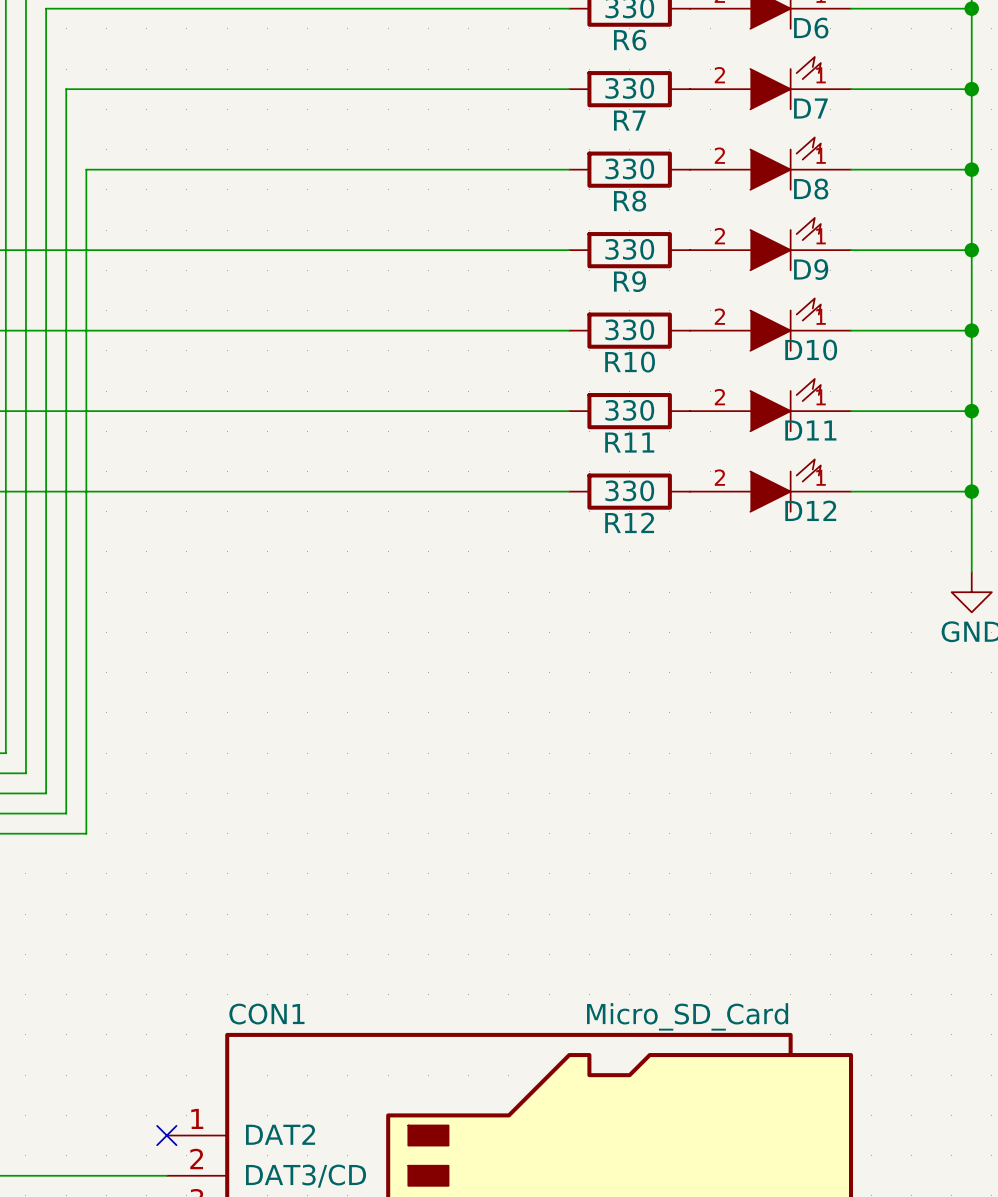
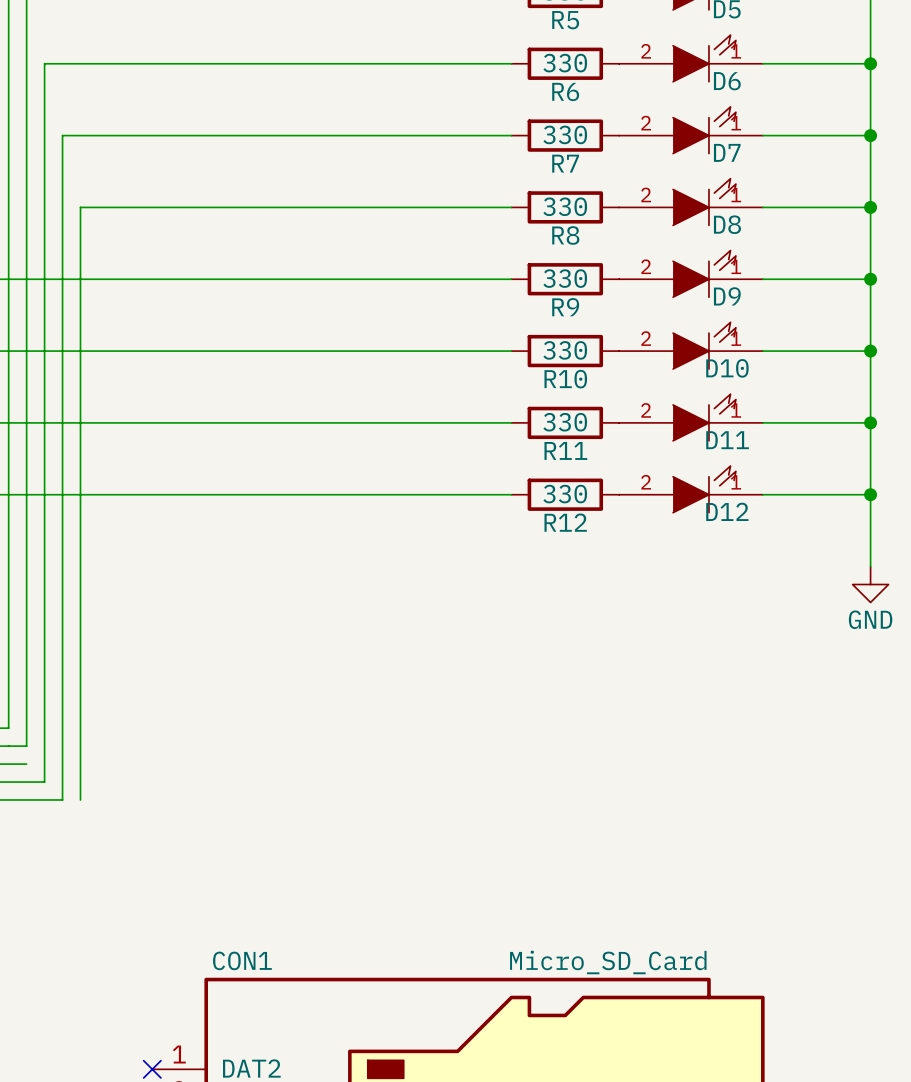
wire: (25, 793) (46, 793) -> none
wire: (46, 813) (66, 813) -> (44, 782) (44, 764)
wire: (66, 833) (86, 833) -> (62, 799) (62, 782)

